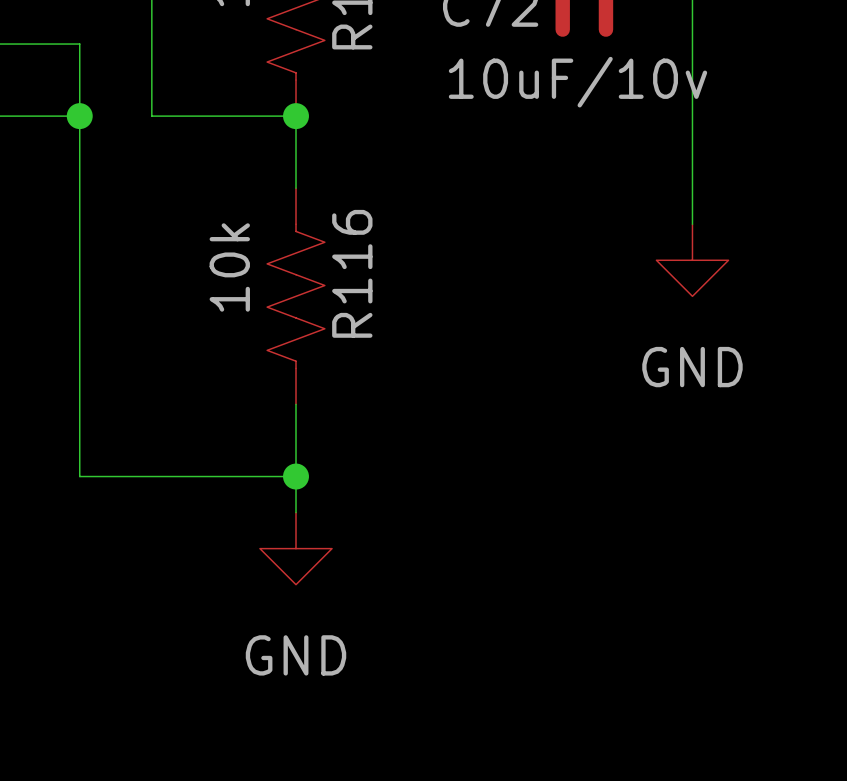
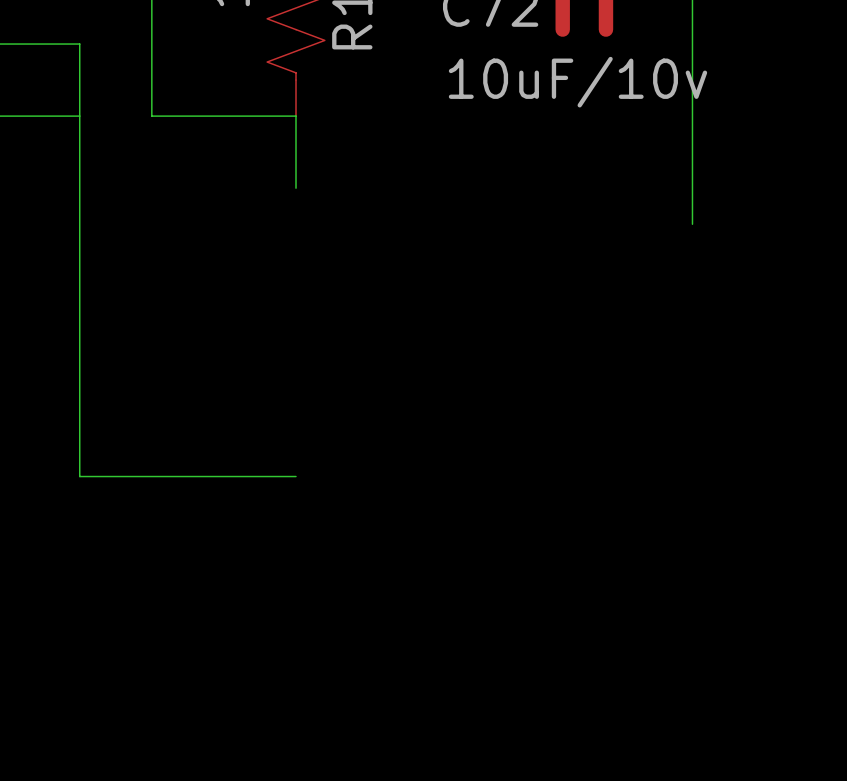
junction: (79, 116) -> none
junction: (296, 116) -> none
power symbol: GND (692, 260) -> none
R116: 10k (296, 296) -> none
wire: (296, 404) (296, 512) -> none
junction: (296, 476) -> none
power symbol: GND (296, 548) -> none

